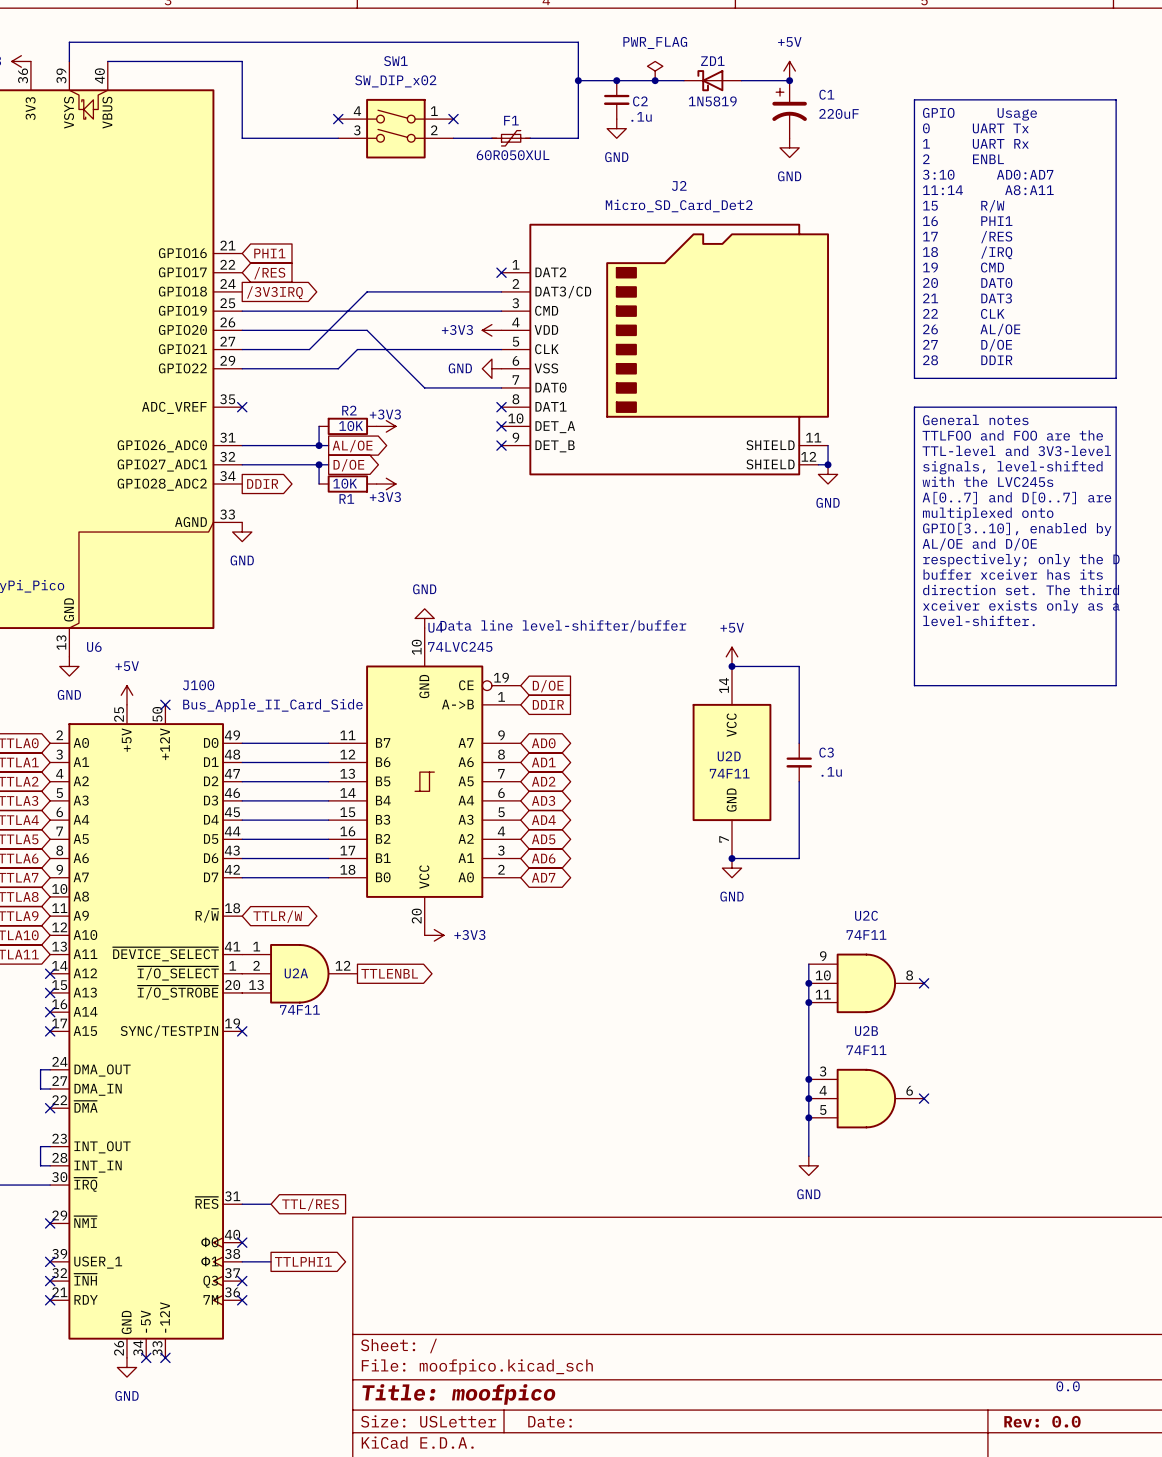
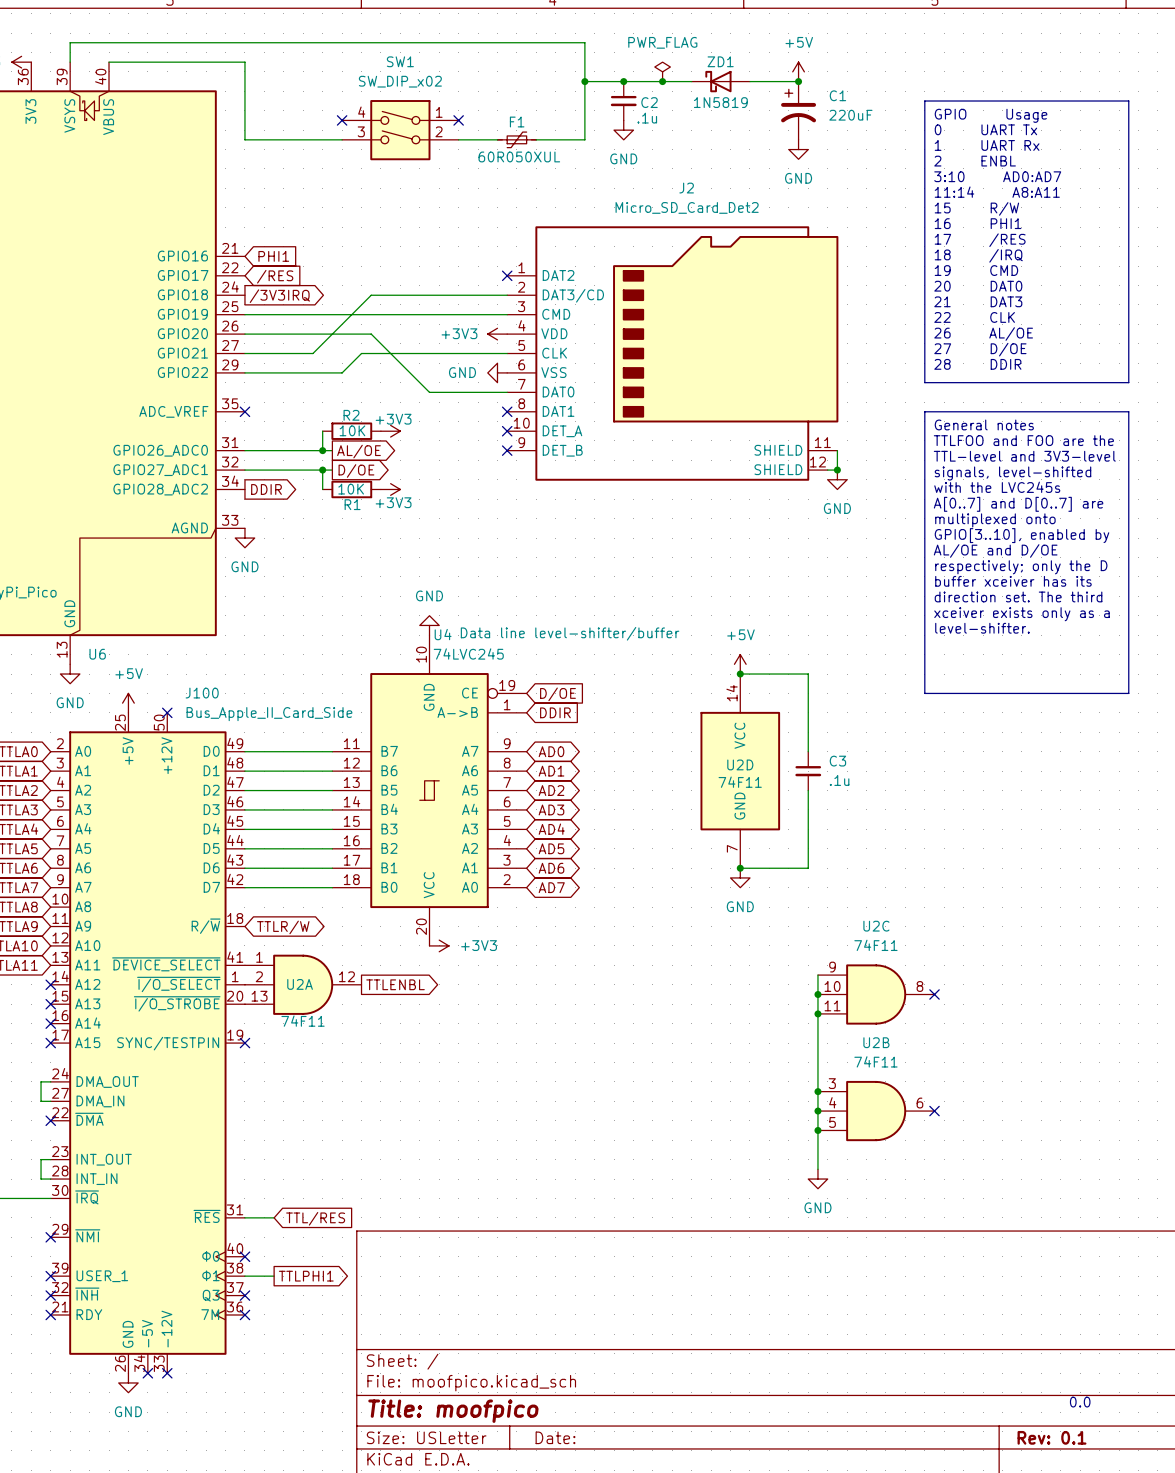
title block: Rev: 0.0 (1042, 1421) -> Rev: 0.1 (1051, 1437)

